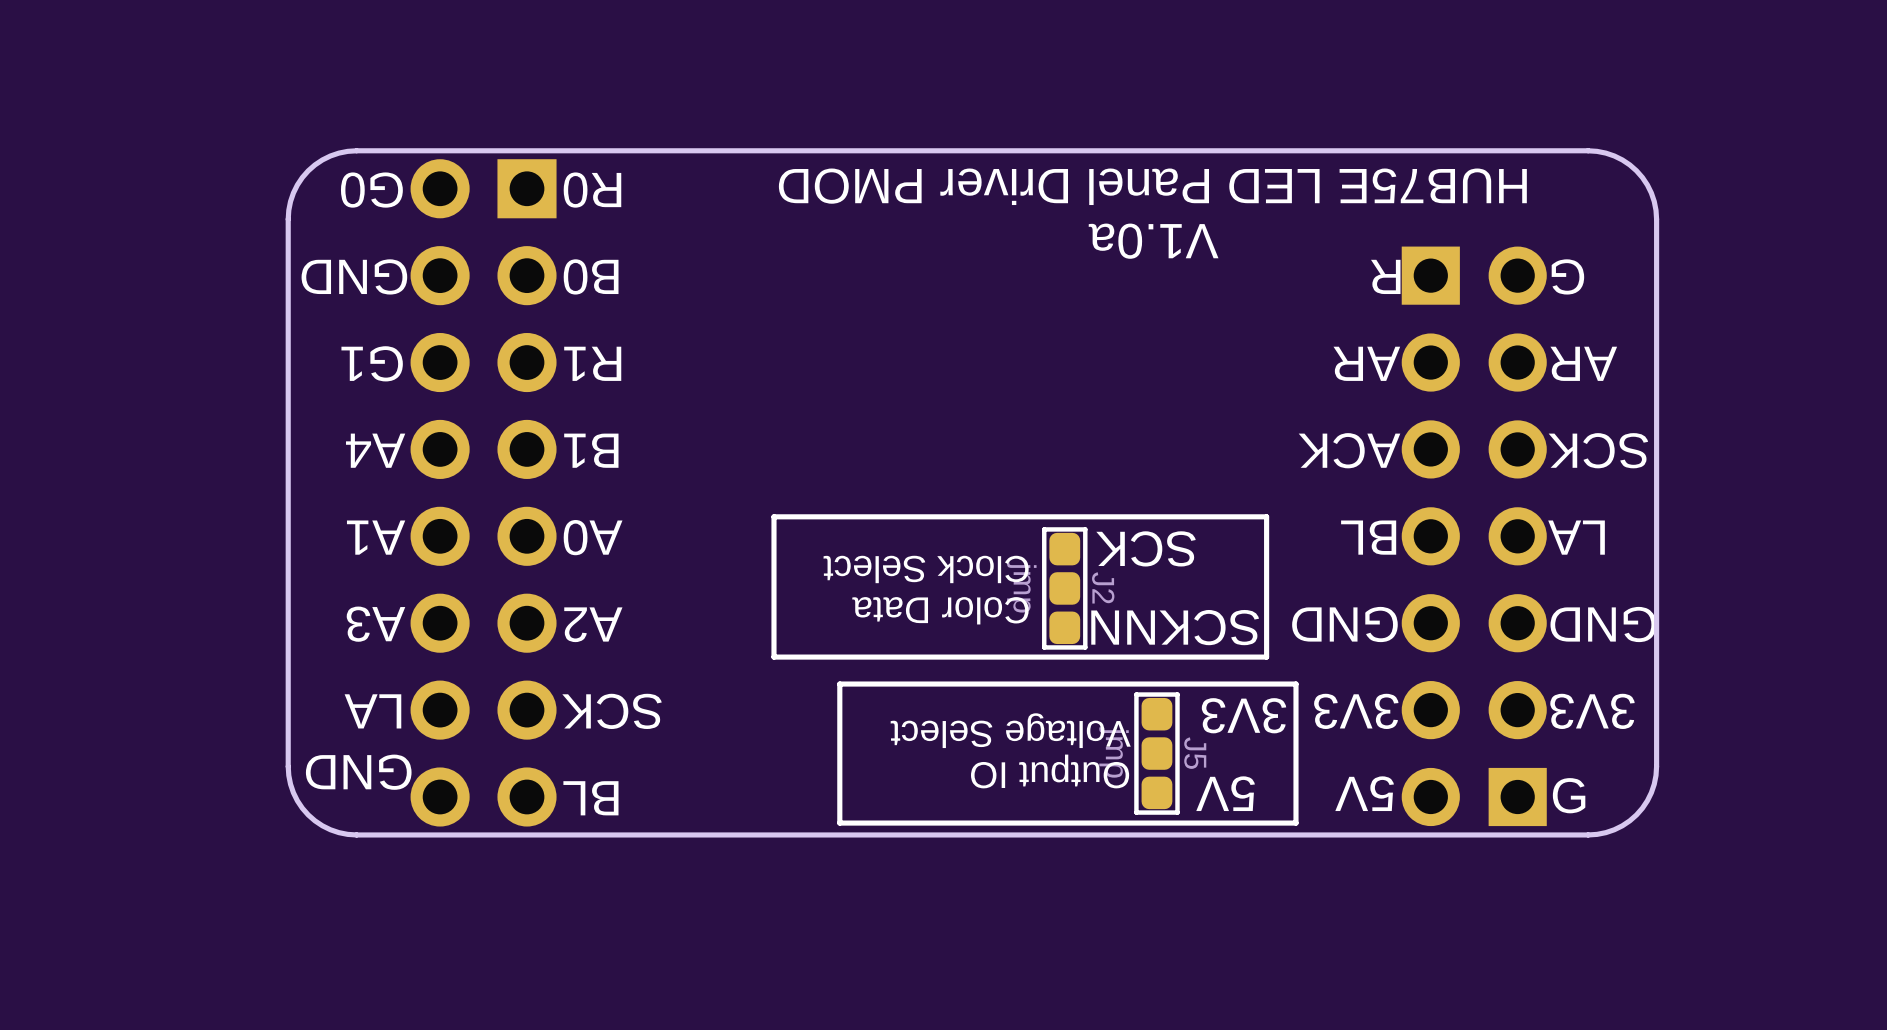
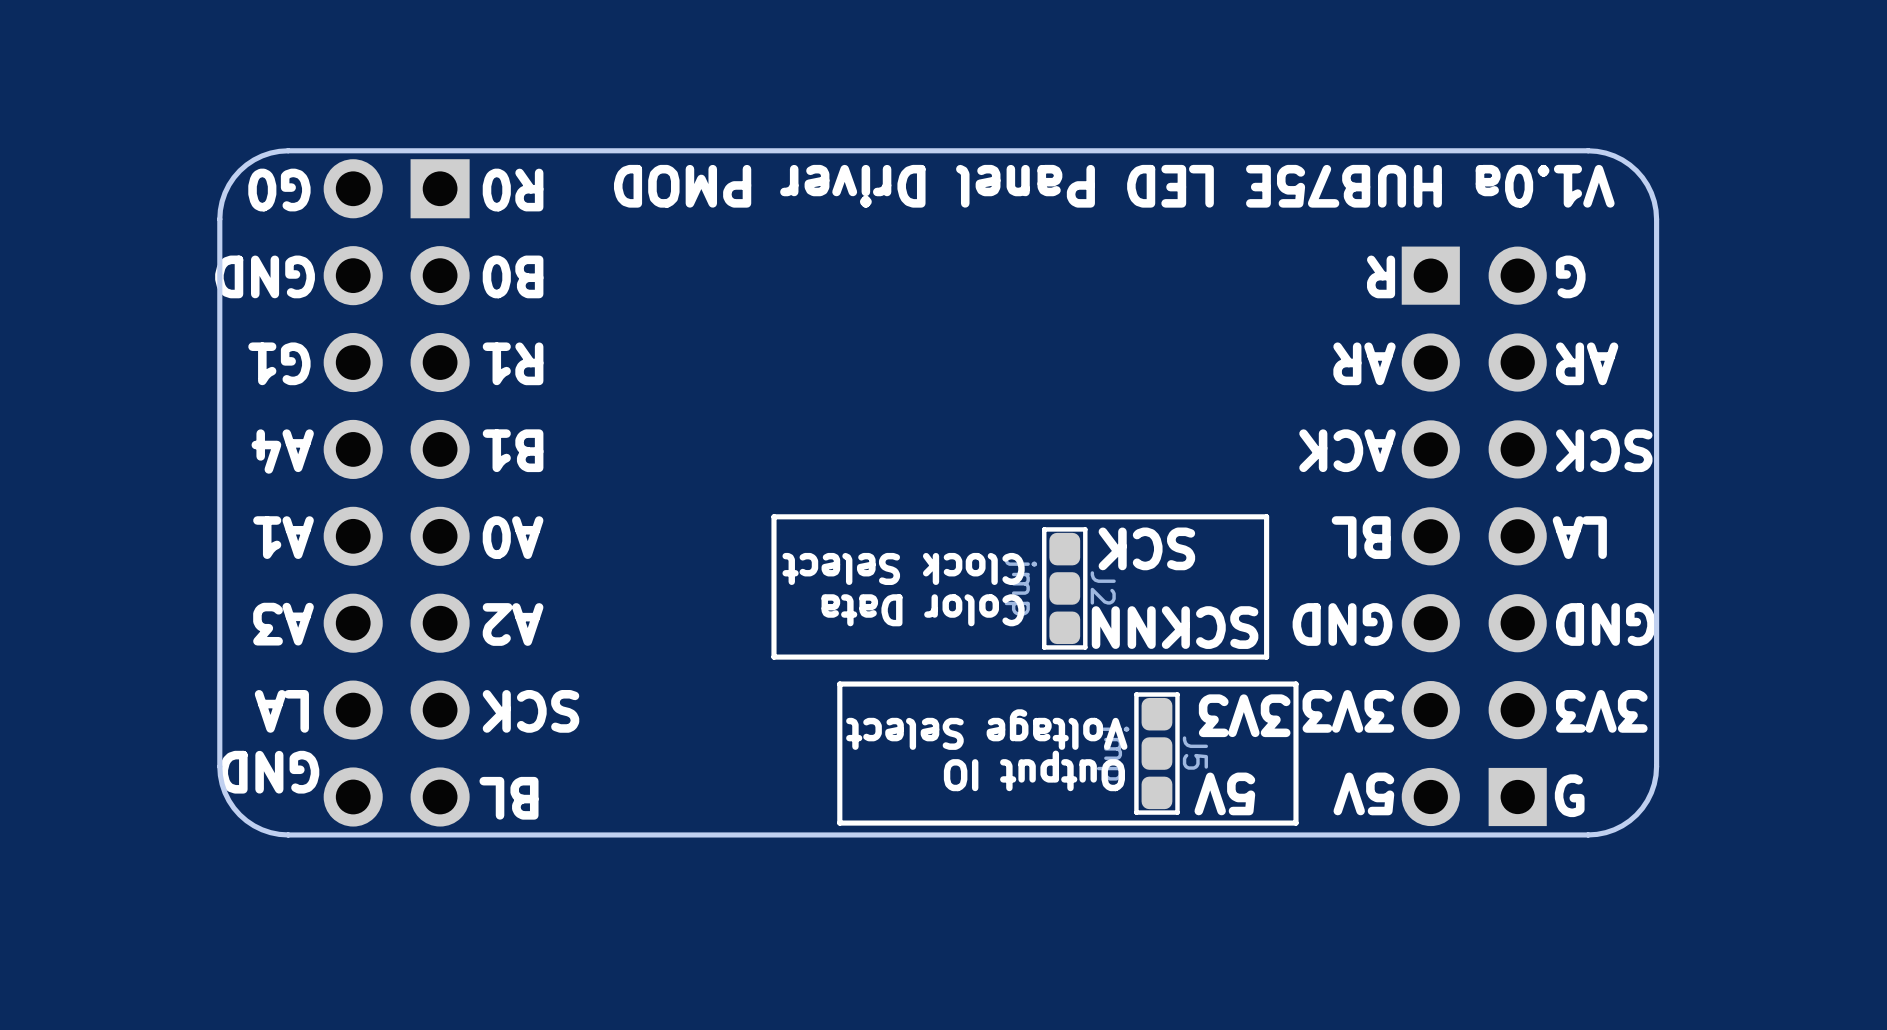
board edge: (356, 150) (330, 155) (308, 170) (293, 193) (288, 219) (288, 775) (297, 800) (314, 820) (338, 832) (356, 834) -> (356, 150) (279, 151) (254, 159) (239, 170) (228, 184) (222, 201) (219, 219) (219, 766) (222, 784) (233, 808) (246, 820) (262, 829) (288, 834) (356, 834)
text: HUB75E LED Panel Driver PMOD (1152, 186) -> V1.0a HUB75E LED Panel Driver PMOD (1114, 186)
text position: G0 (371, 190) -> G0 (279, 190)
text position: R0 (592, 190) -> R0 (513, 190)
text: V1.0a (1153, 241) -> none
text position: GND (354, 276) -> GND (265, 276)
text position: B0 (591, 276) -> B0 (513, 276)
text position: G1 (372, 363) -> G1 (279, 363)
text position: R1 (592, 363) -> R1 (513, 363)
text position: A4 (375, 450) -> A4 (282, 451)
text position: B1 (591, 450) -> B1 (513, 450)
part position: (483, 492) -> (396, 492)
text position: A1 (376, 537) -> A1 (283, 537)
text position: A0 (593, 537) -> A0 (513, 537)
text position: A3 (375, 624) -> A3 (283, 624)
text position: A2 (593, 624) -> A2 (513, 624)
text position: LA (372, 711) -> LA (281, 711)
text position: SCK (612, 711) -> SCK (530, 711)
text position: GND (358, 772) -> GND (269, 772)
text position: BL (590, 798) -> BL (509, 798)

